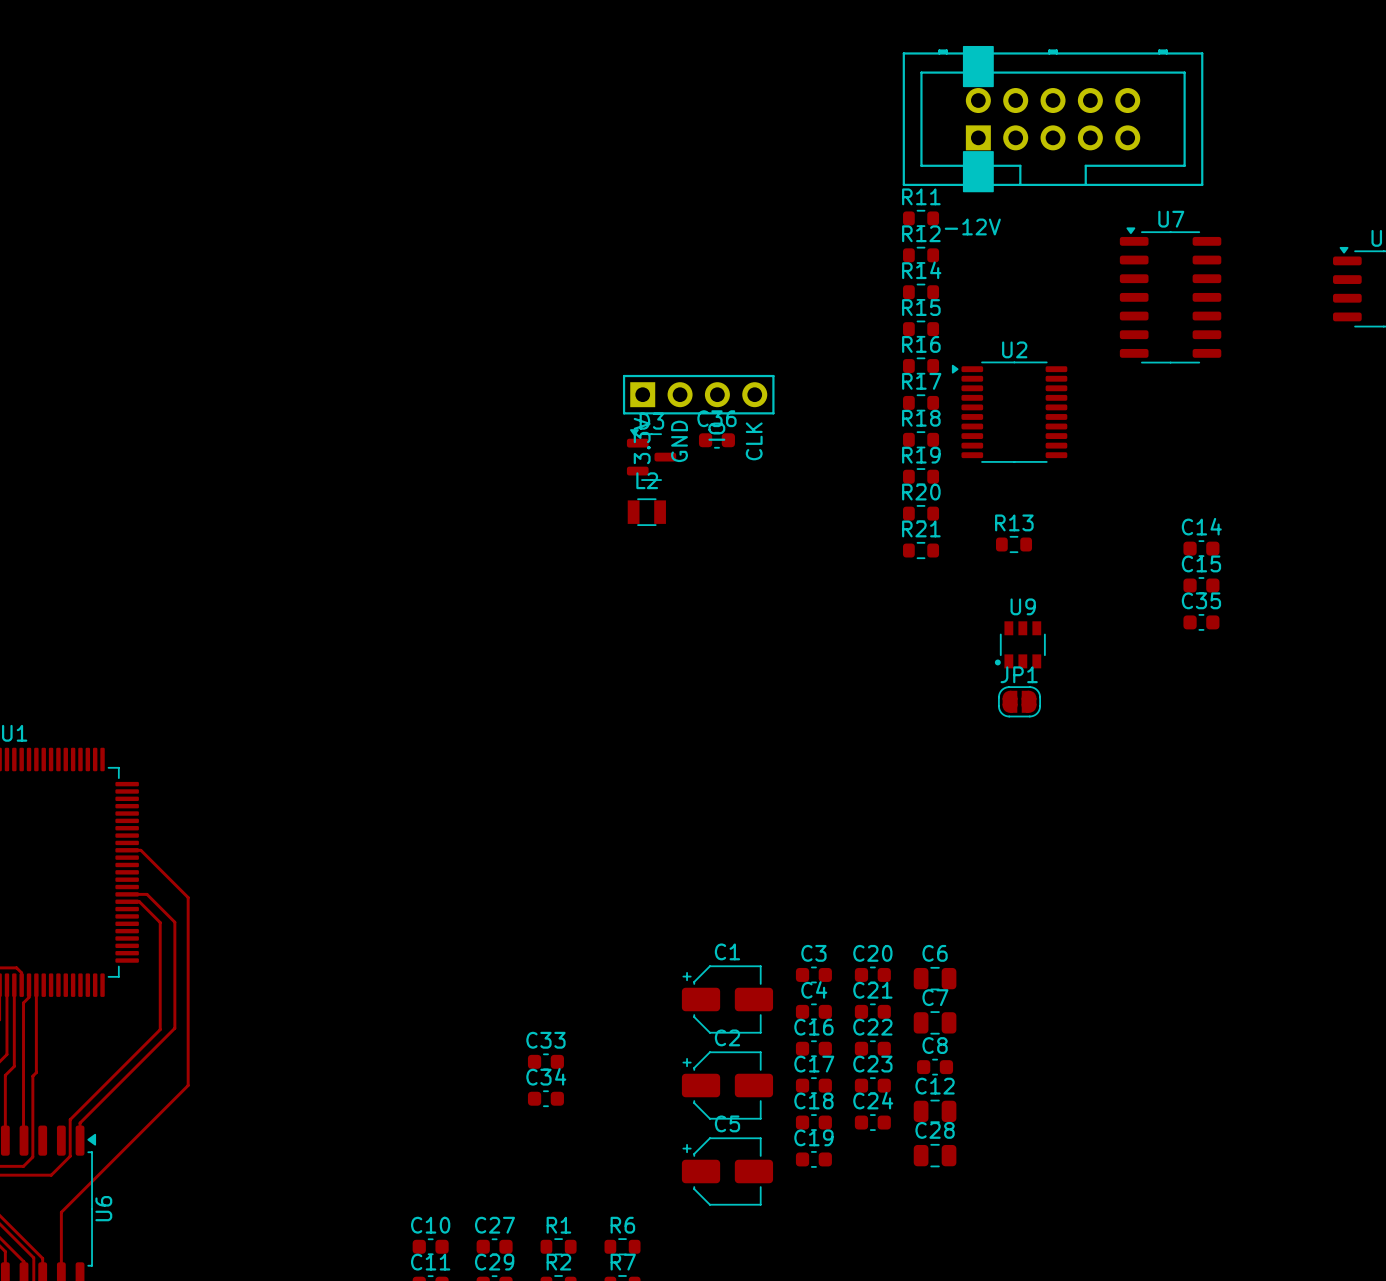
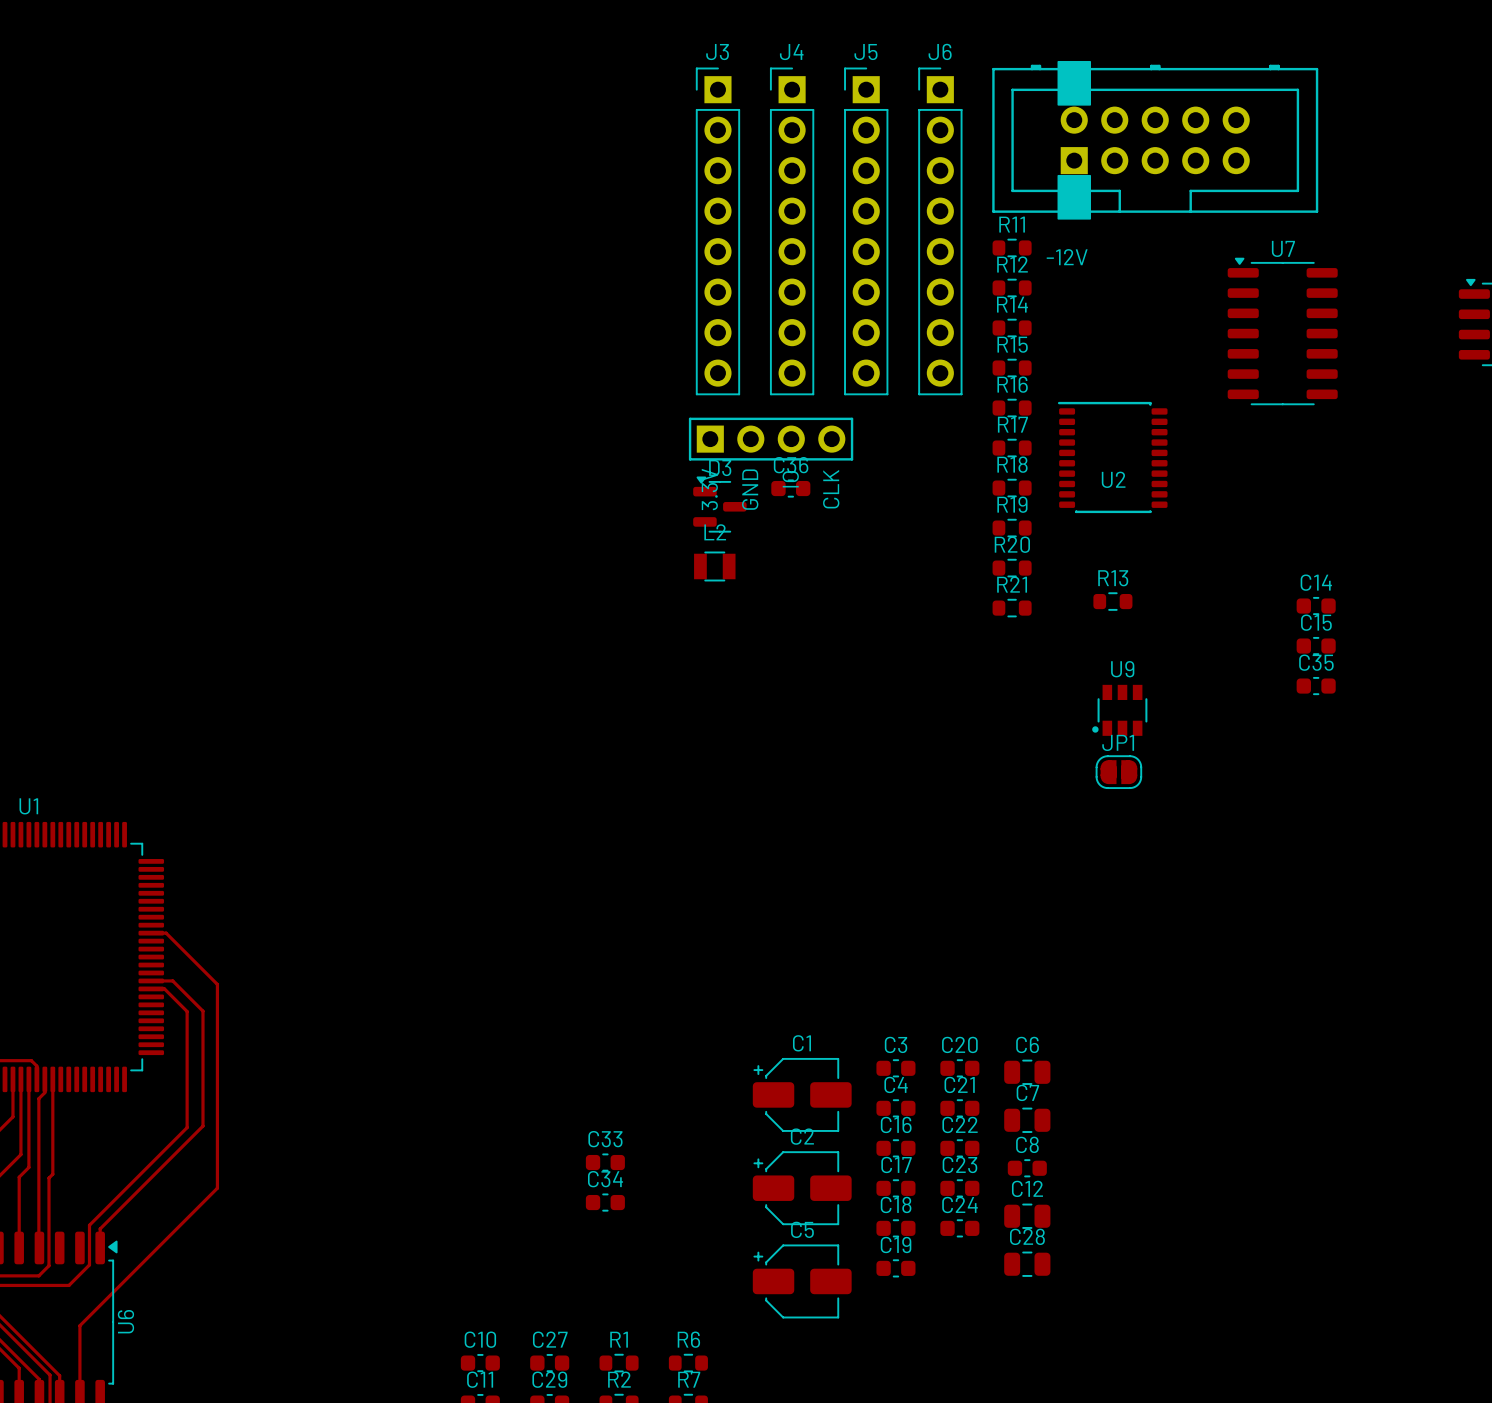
J3: none -> (717, 231)
J4: none -> (792, 231)
J5: none -> (866, 231)
J6: none -> (940, 231)
U2 name position: U2 (1014, 349) -> U2 (1113, 479)
U2 footprint: [951, 361, 1068, 463] -> [1057, 401, 1168, 514]

